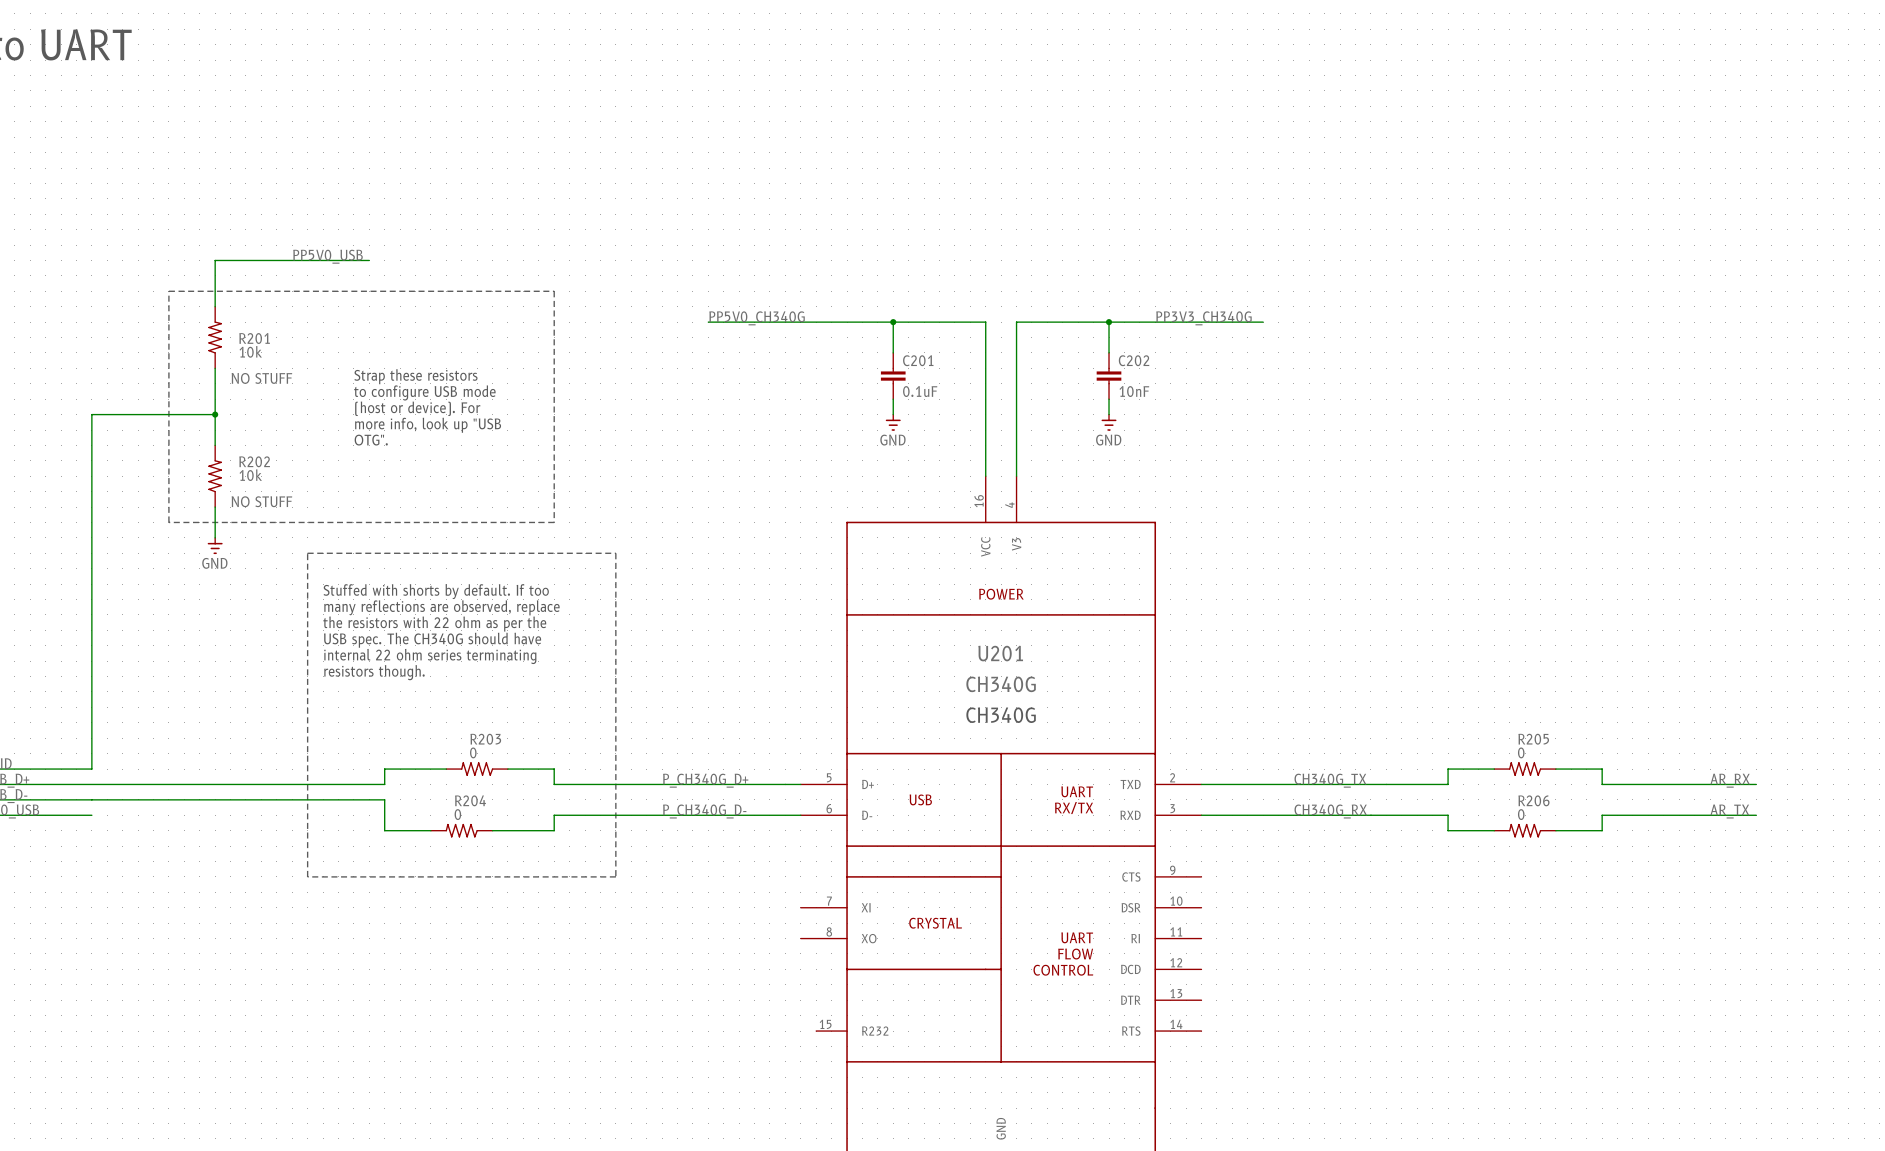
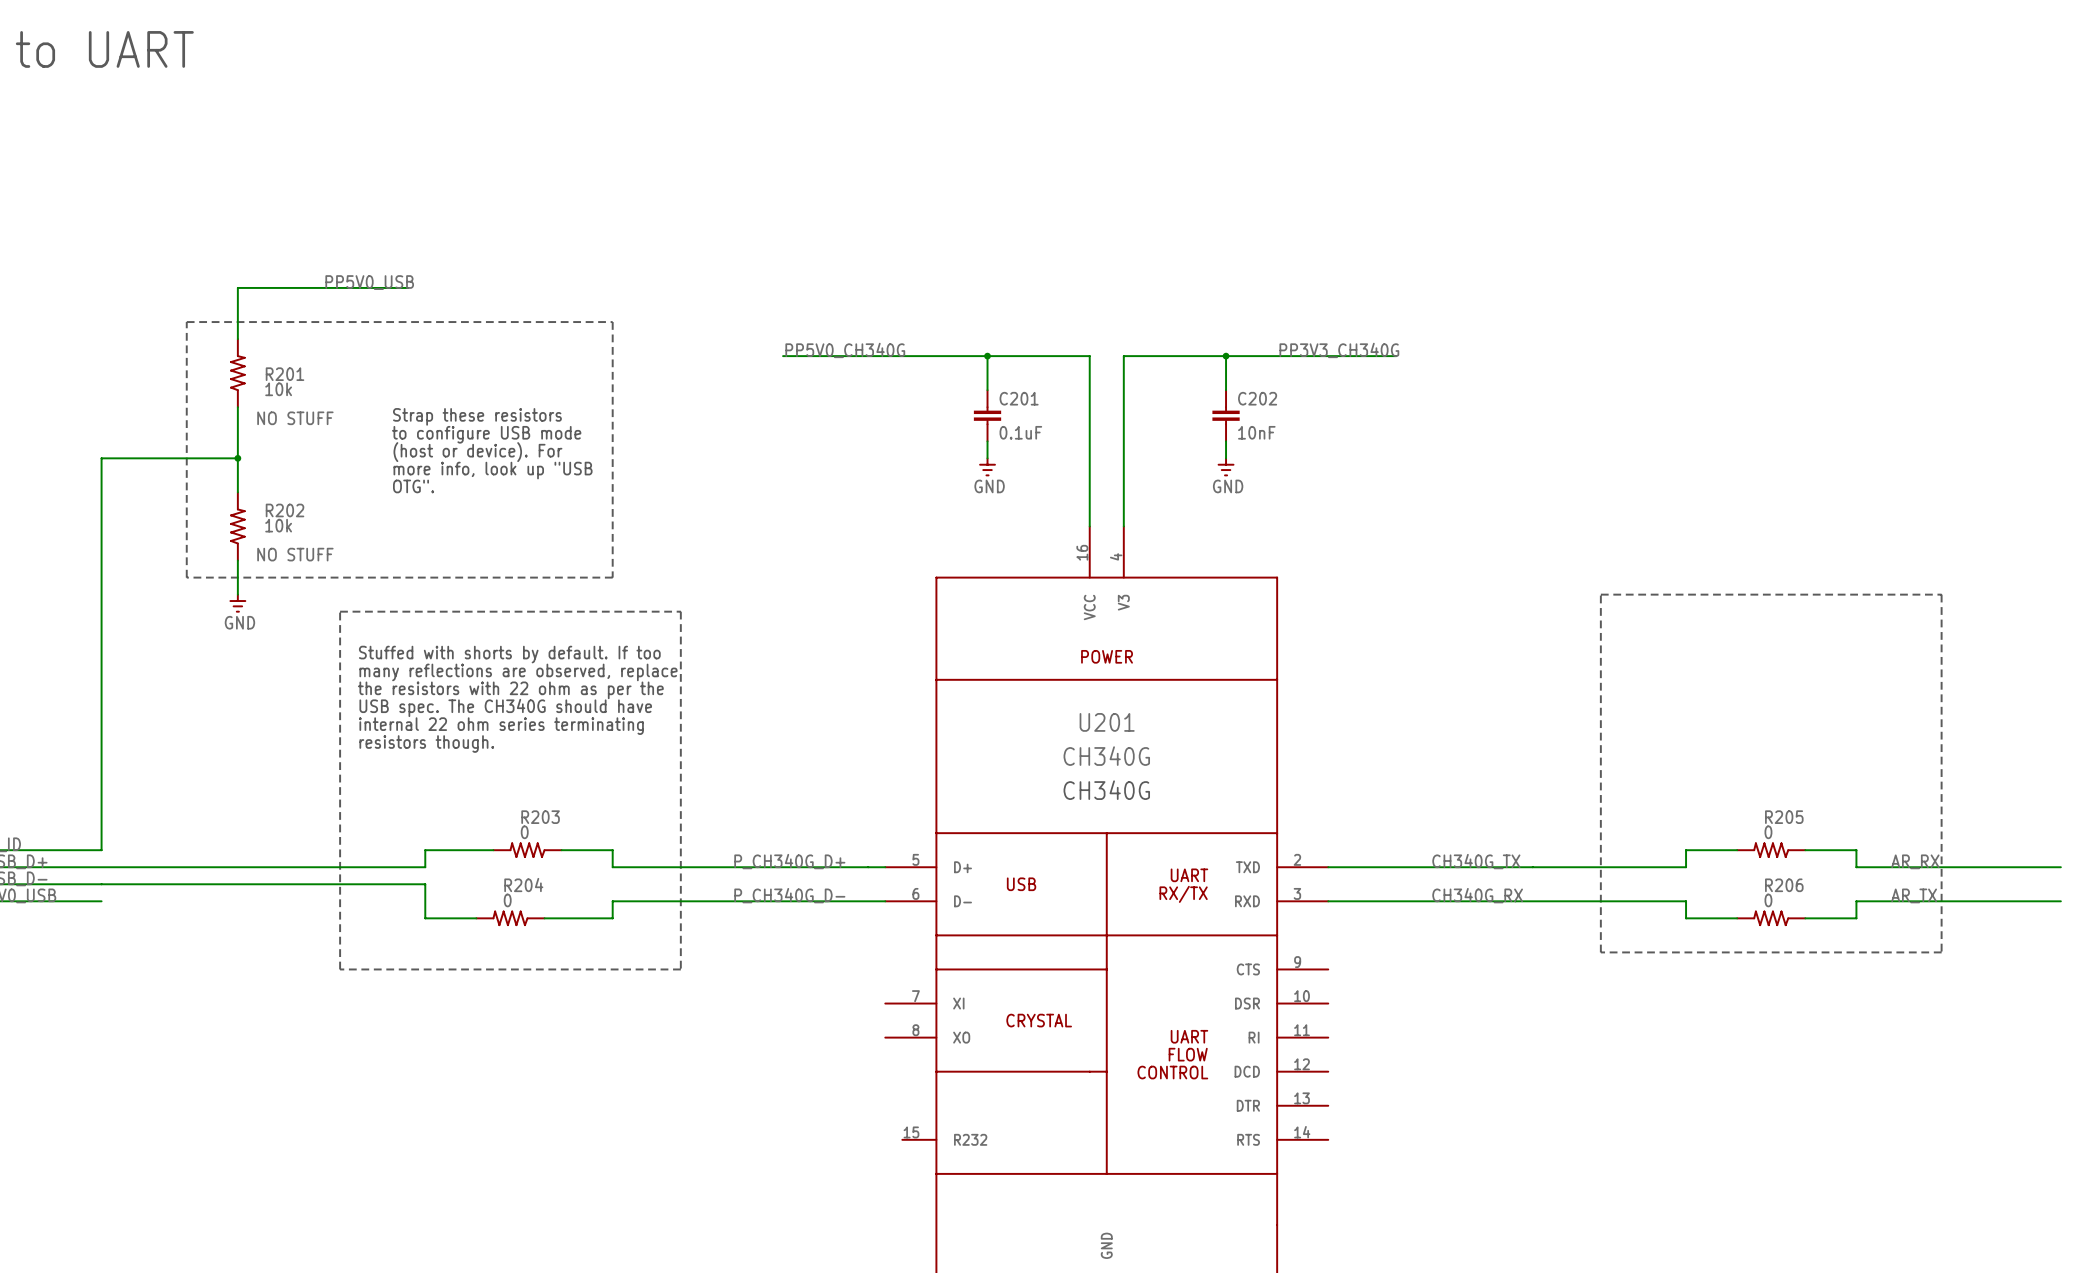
line: none -> (1600, 594) (1941, 594) (1941, 952) (1600, 952) (1600, 594)
wire: (1494, 769) (1448, 769) (1448, 784) -> (1720, 850) (1686, 850) (1686, 867) (1600, 867)
R205 position: (1525, 769) -> (1771, 850)
wire: (1571, 769) (1602, 769) (1602, 784) (1679, 784) -> (1805, 850) (1856, 850) (1856, 867)
wire: none -> (1941, 867) (2060, 867)
wire: (1448, 815) (1448, 830) (1494, 830) -> (1600, 901) (1686, 901) (1686, 918) (1720, 918)
wire: (1679, 815) (1602, 815) (1602, 830) (1571, 830) -> (1856, 901) (1856, 918) (1805, 918)
wire: none -> (1941, 901) (2060, 901)
R206 position: (1525, 830) -> (1771, 918)

